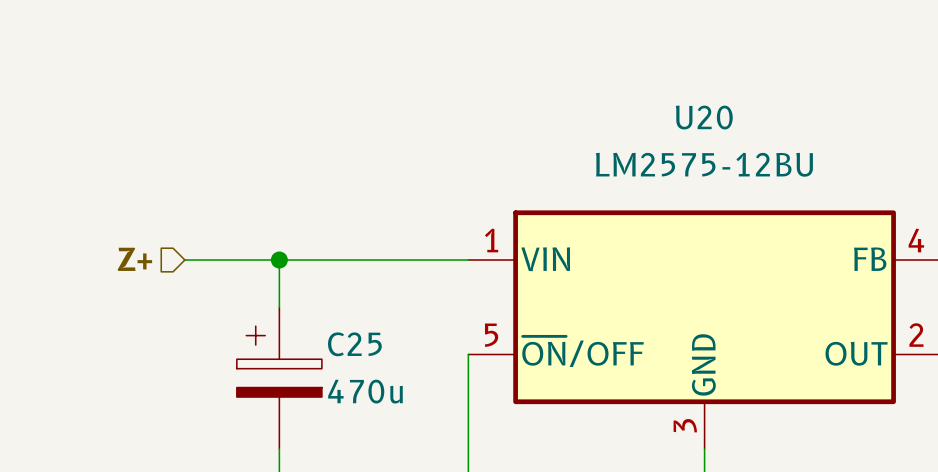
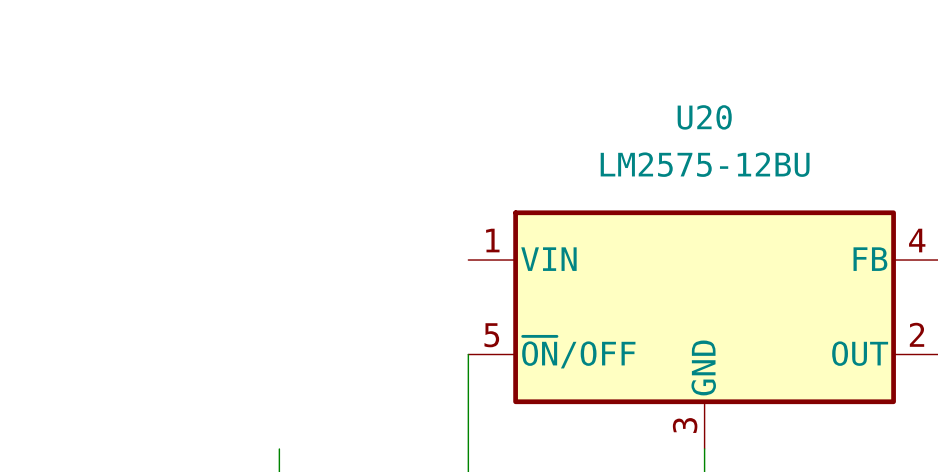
hierarchical label: Z+ (134, 259) -> none
wire: (184, 260) (468, 260) -> none
wire: (279, 260) (279, 307) -> none
junction: (279, 260) -> none
C25: 470u (279, 378) -> none

